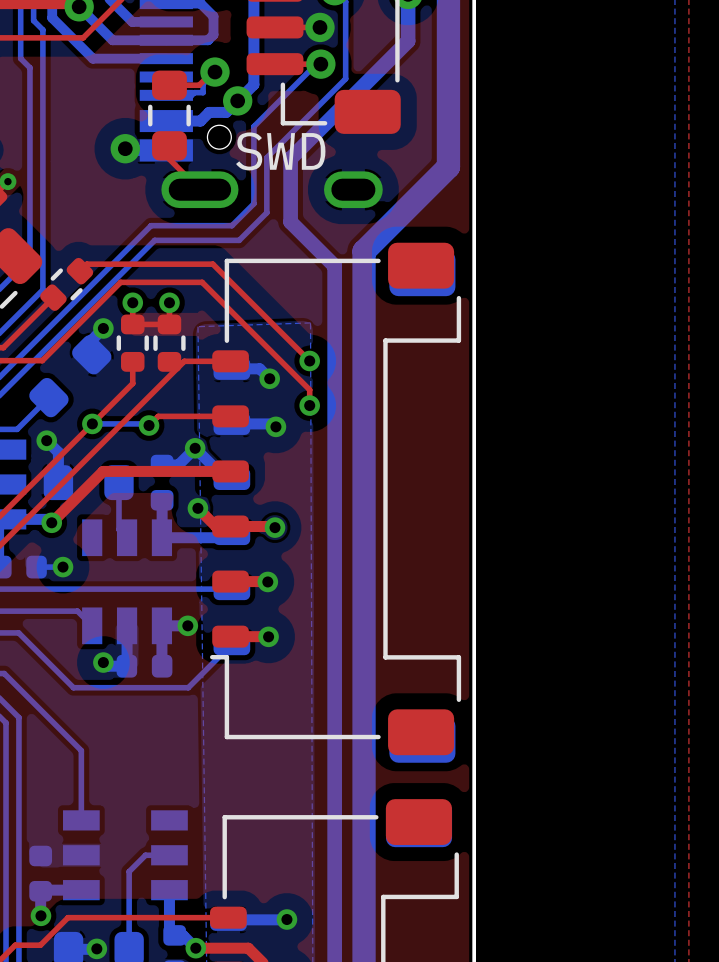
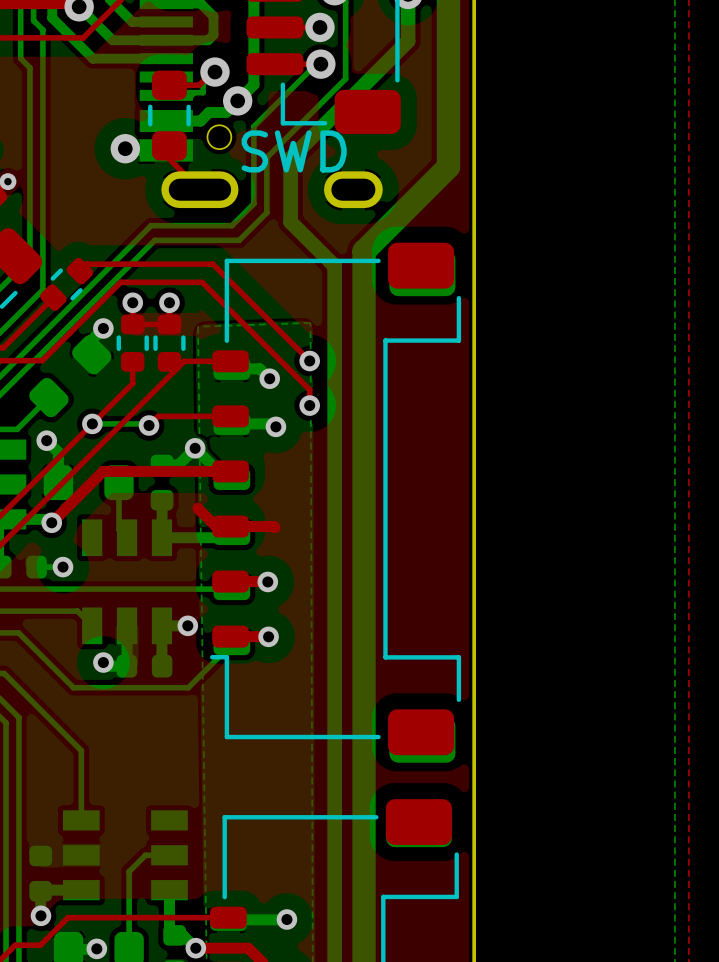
via: (197, 508) -> none
via: (275, 527) -> none

